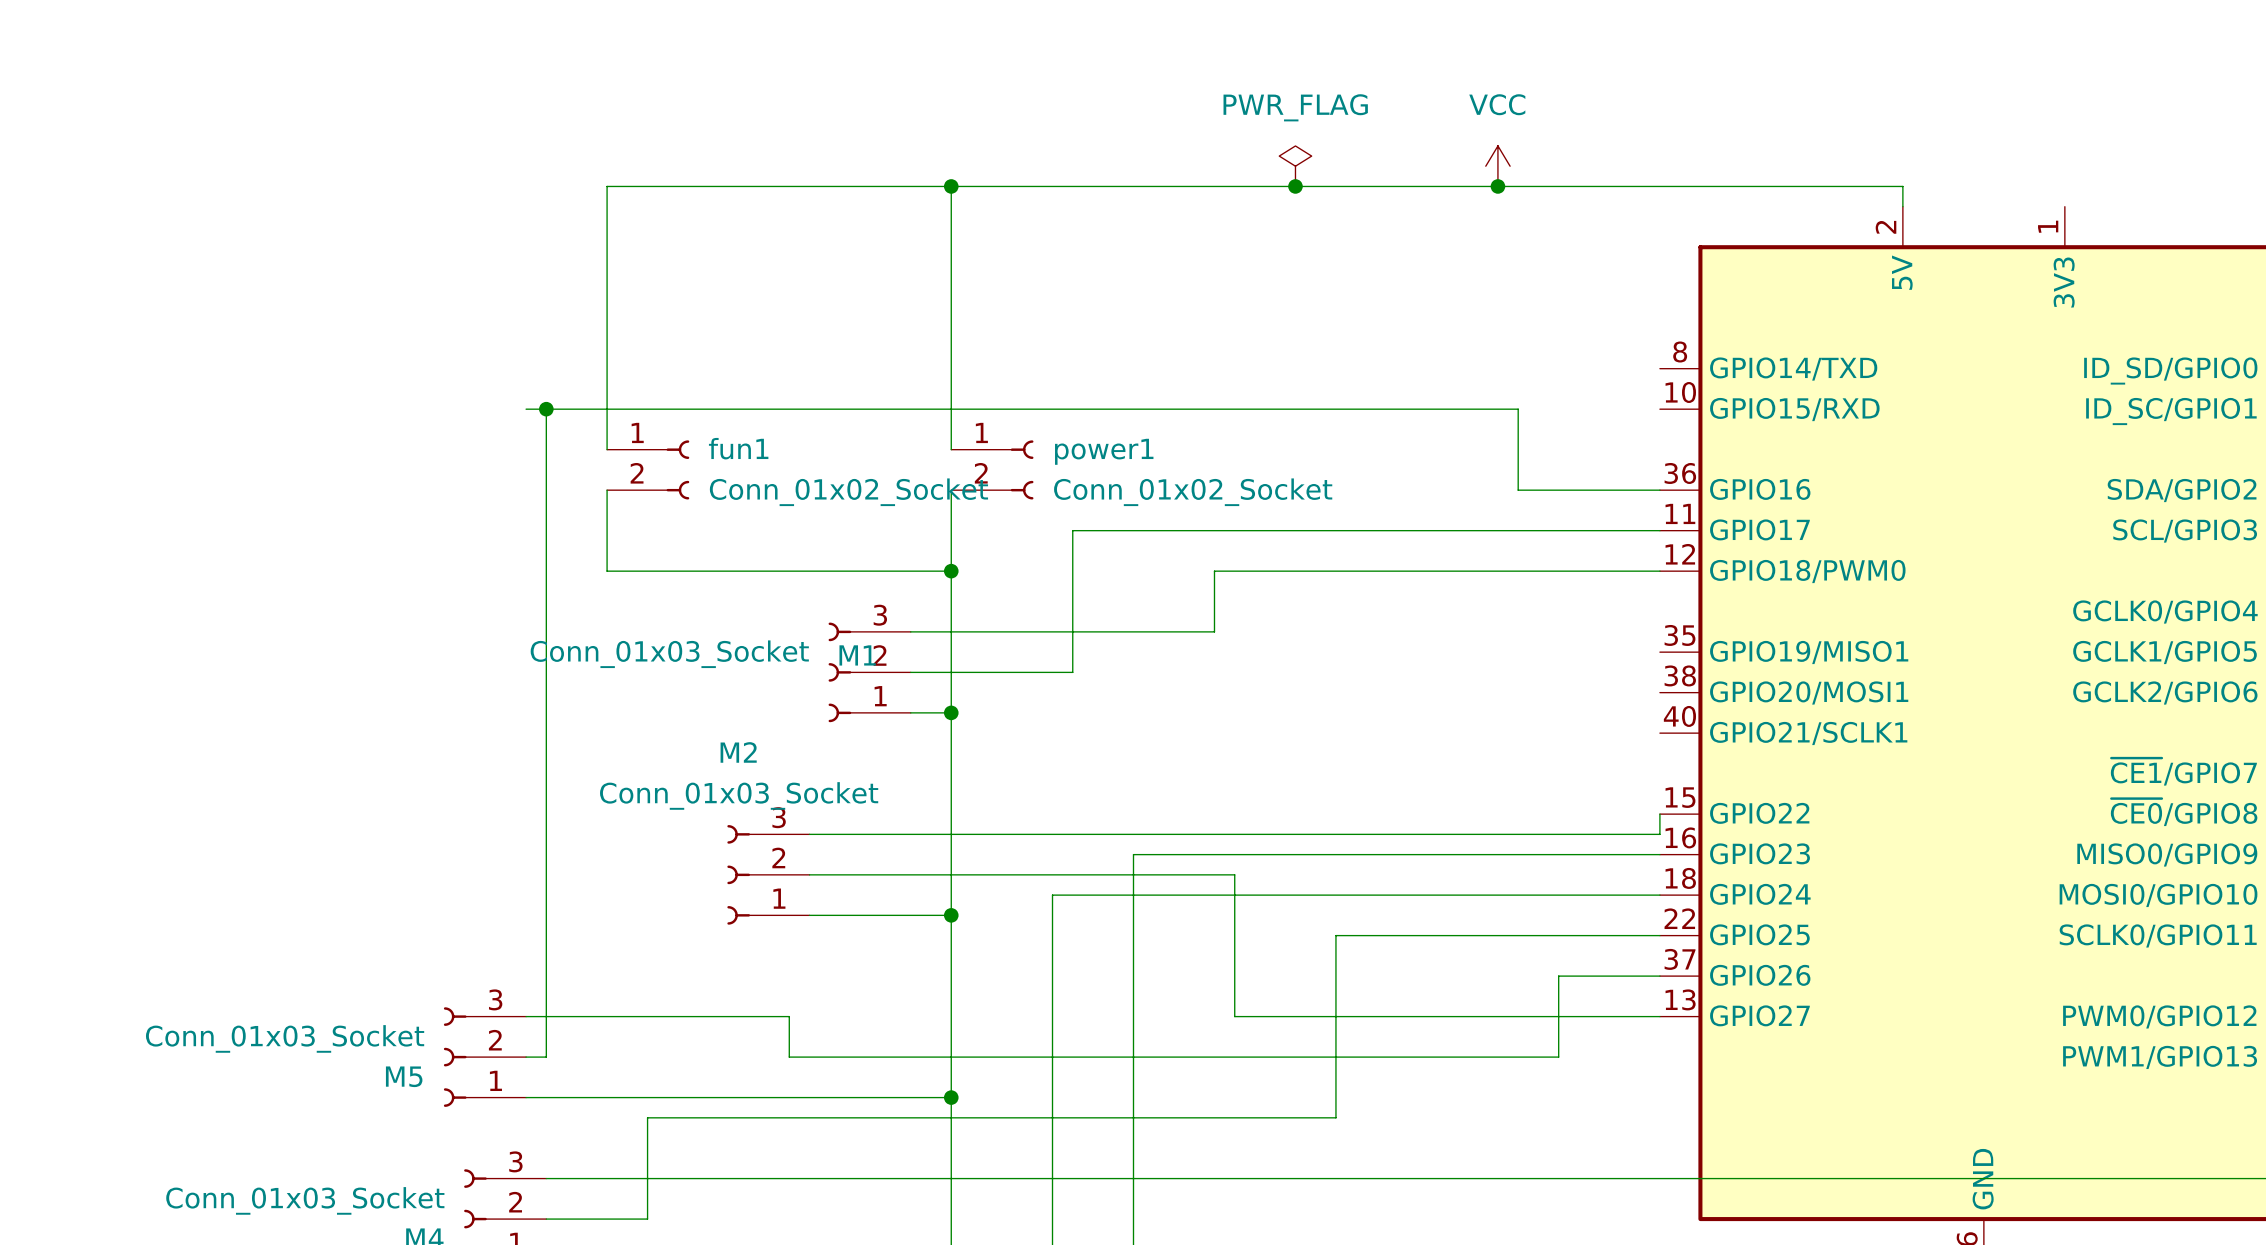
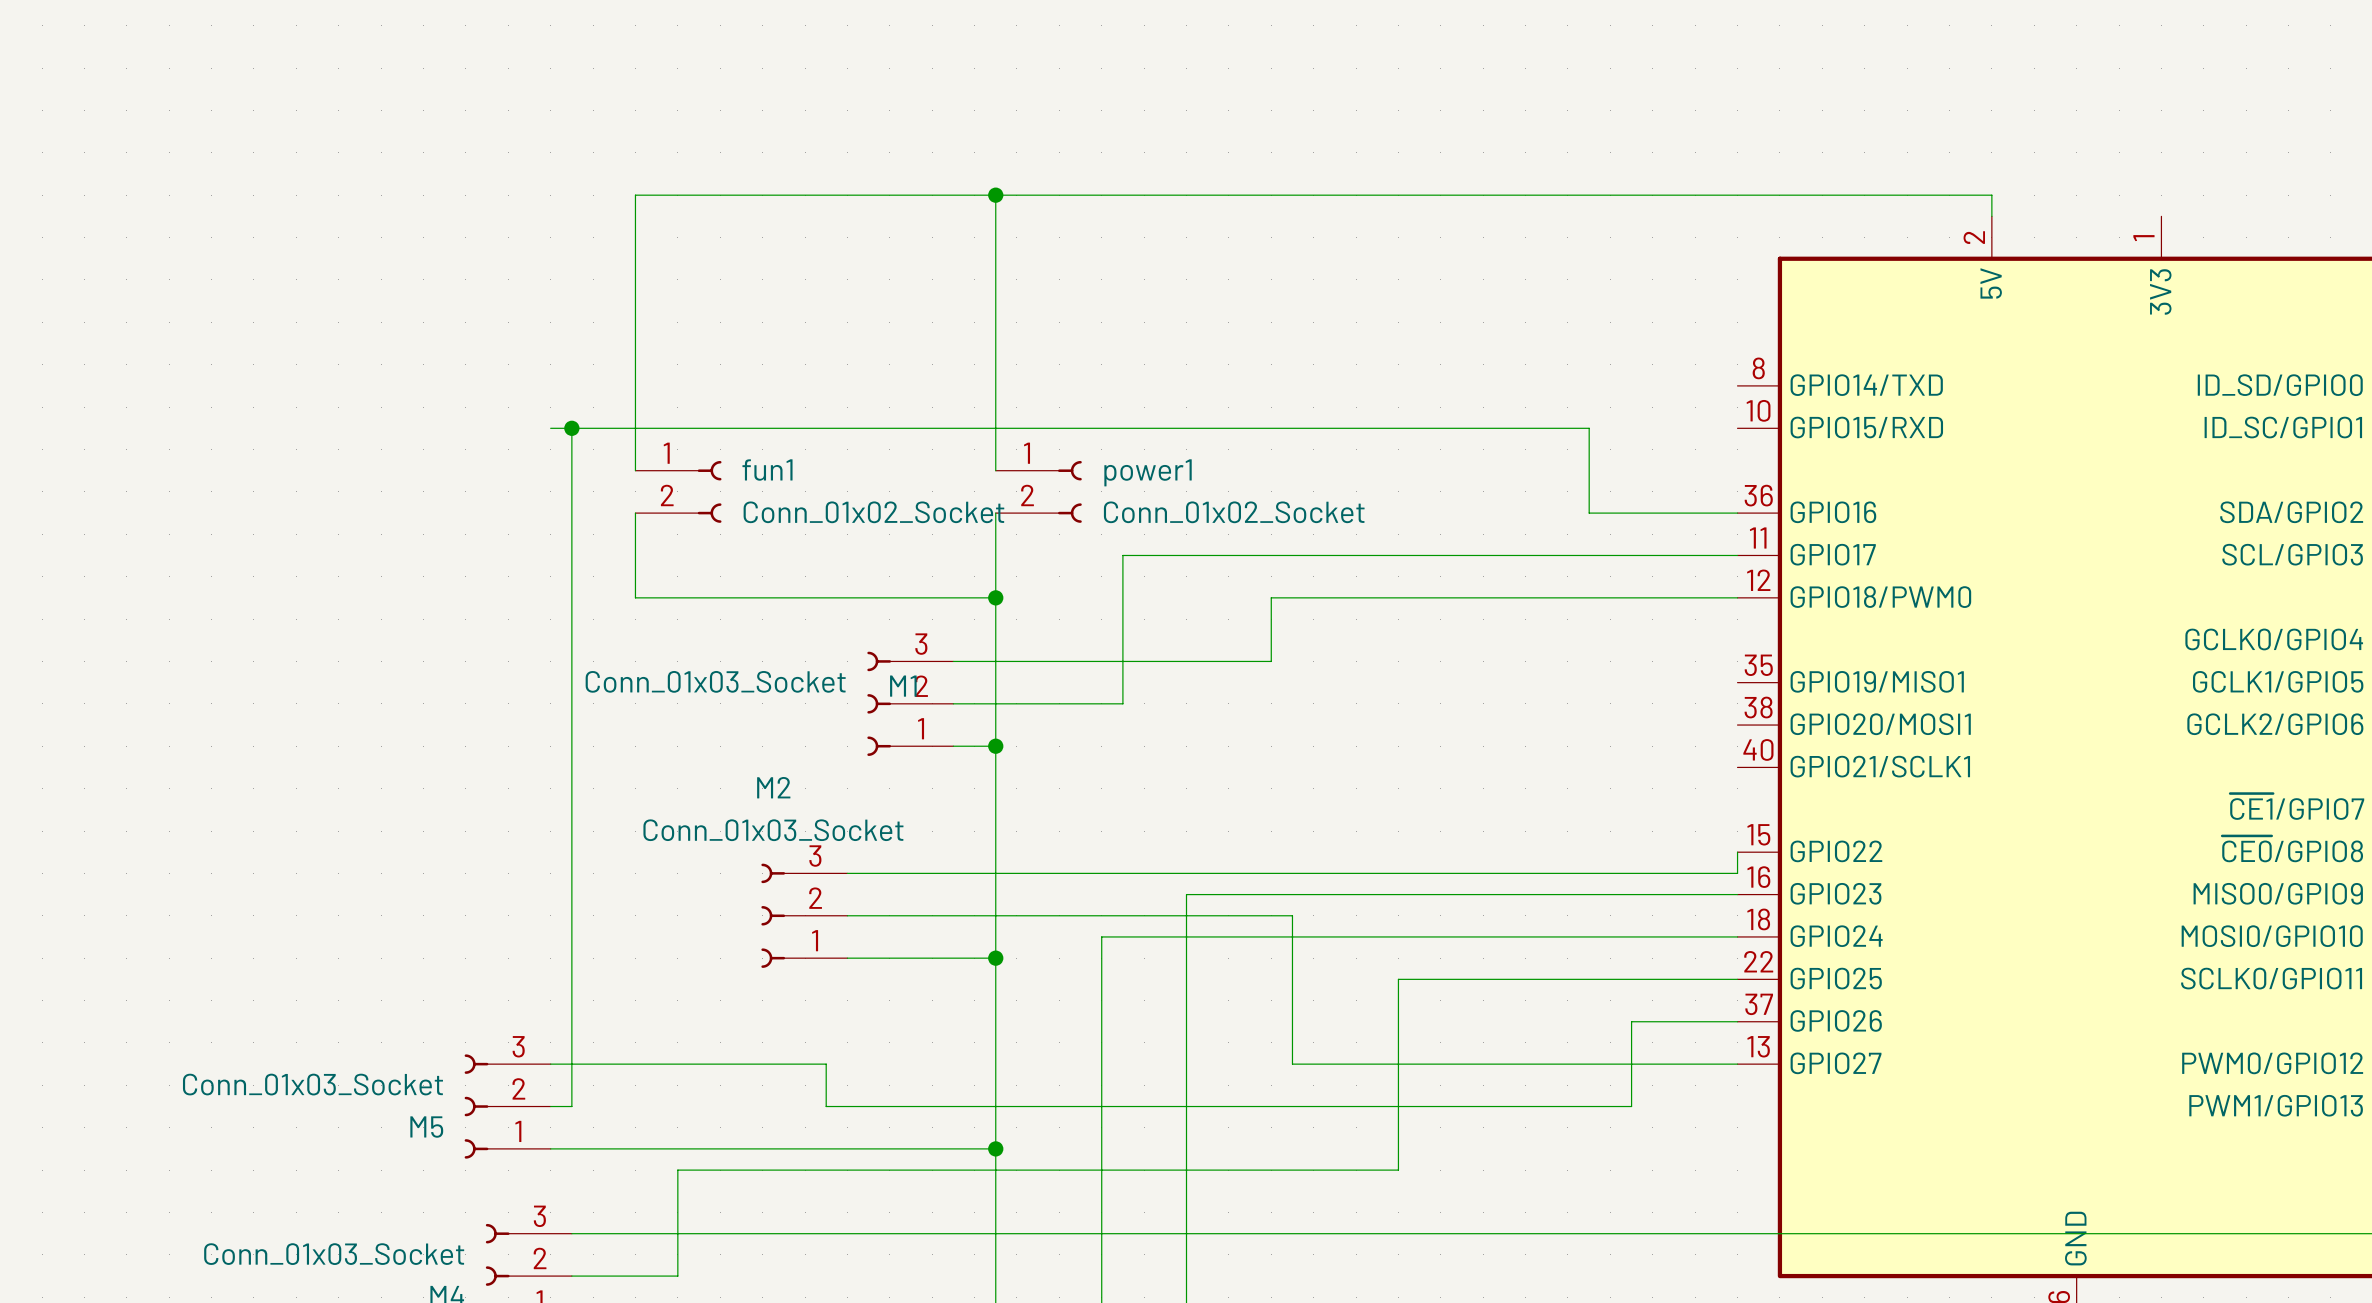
power symbol: PWR_FLAG (1295, 166) -> none
power symbol: VCC (1497, 166) -> none
junction: (1295, 186) -> none
junction: (1497, 186) -> none

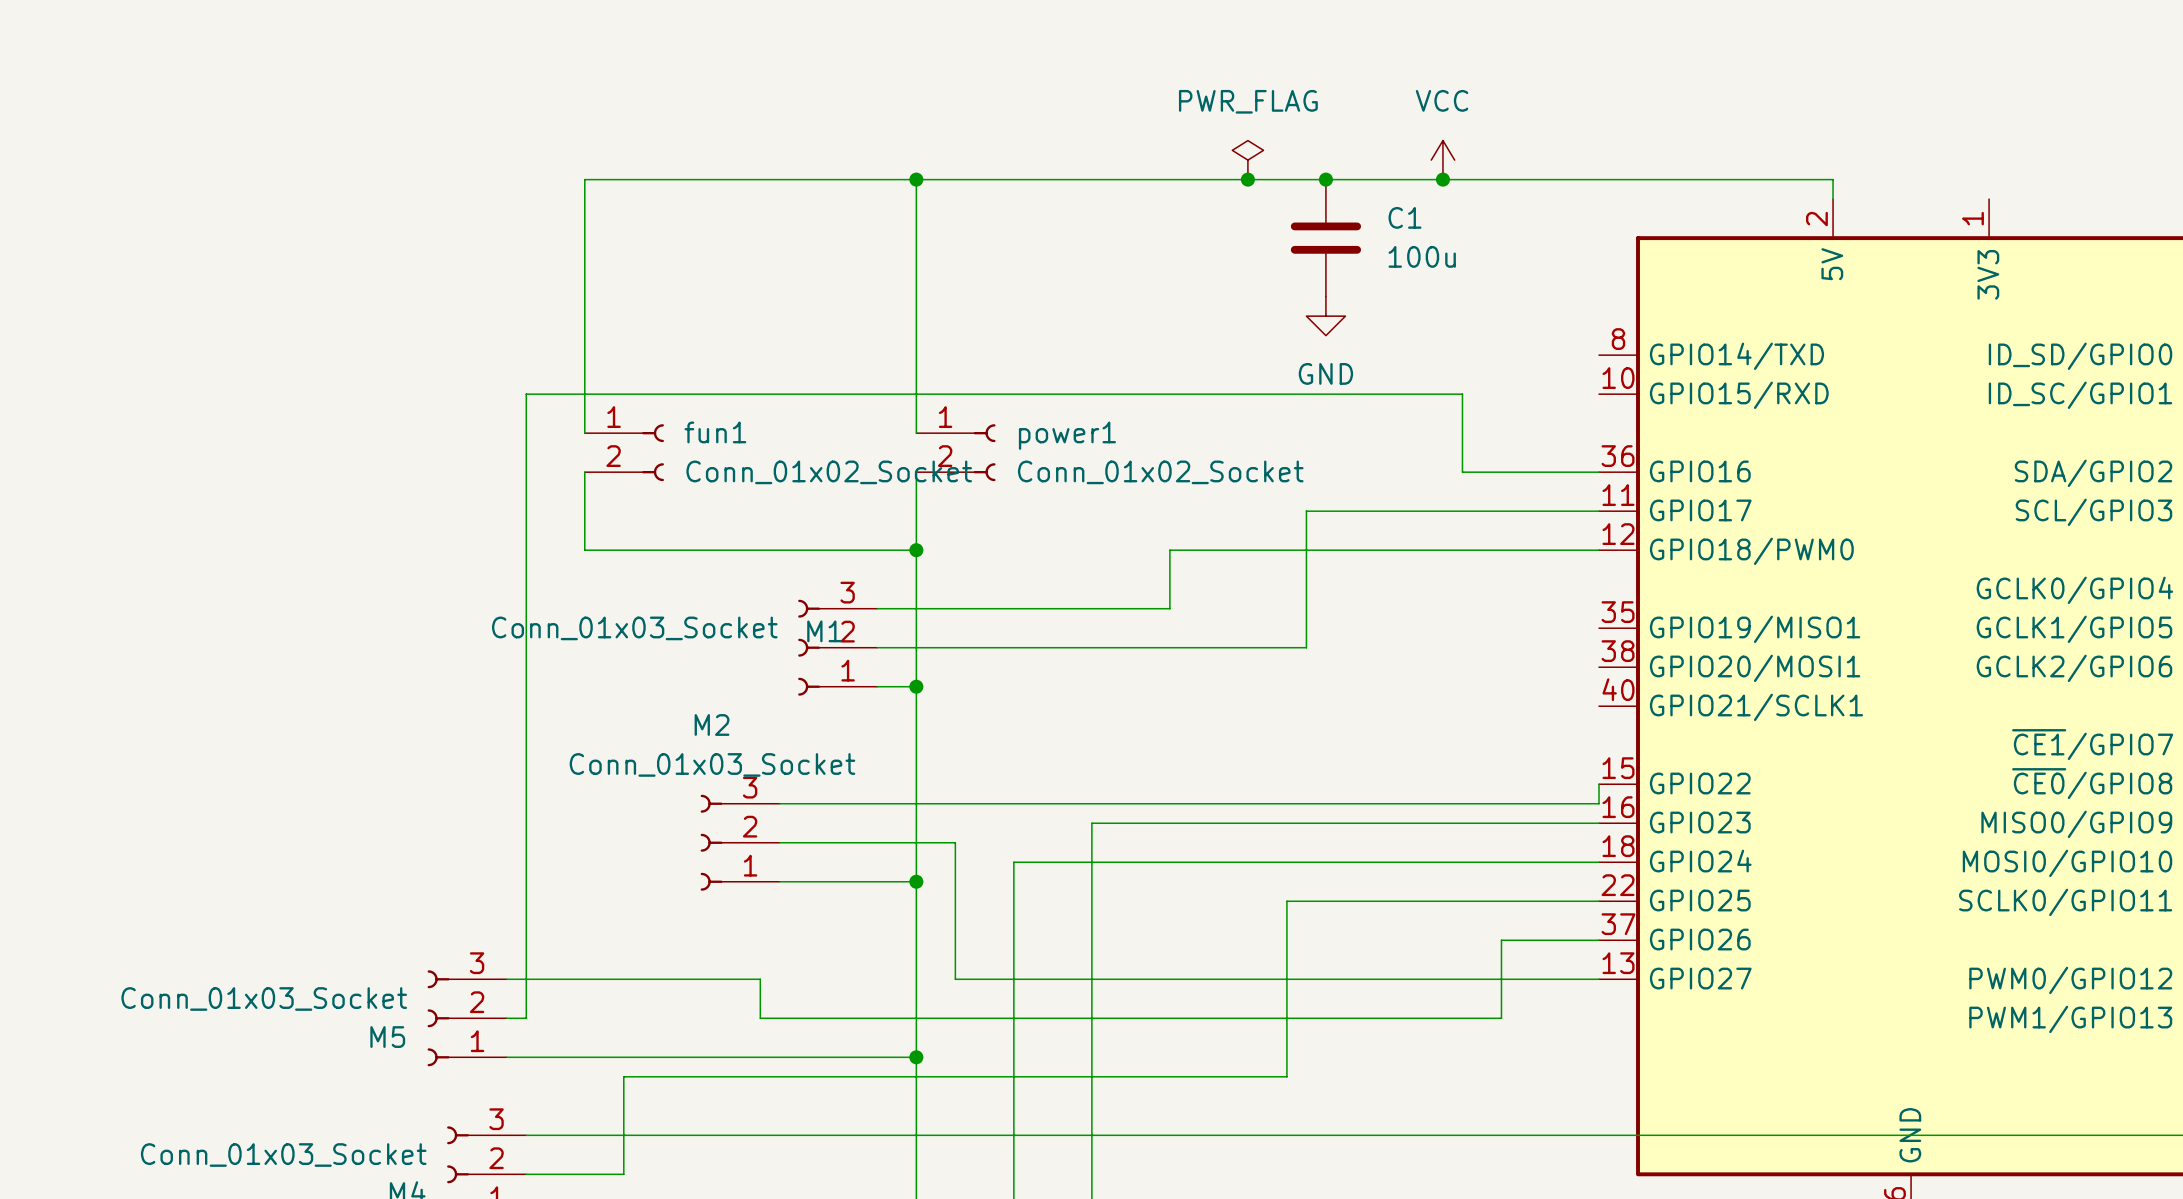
power symbol: none -> PWR_FLAG (1247, 160)
power symbol: none -> VCC (1442, 160)
junction: none -> (1247, 179)
junction: none -> (1325, 179)
junction: none -> (1442, 179)
C1: none -> 100u (1325, 238)
power symbol: none -> GND (1325, 316)
wire: (550, 428) (571, 428) -> none
junction: (571, 428) -> none
wire: (1419, 555) (1122, 555) (1122, 703) -> (1306, 511) (1306, 647) (1033, 647)
wire: (1038, 915) (1292, 915) (1292, 1064) -> (955, 842) (955, 979) (1189, 979)

